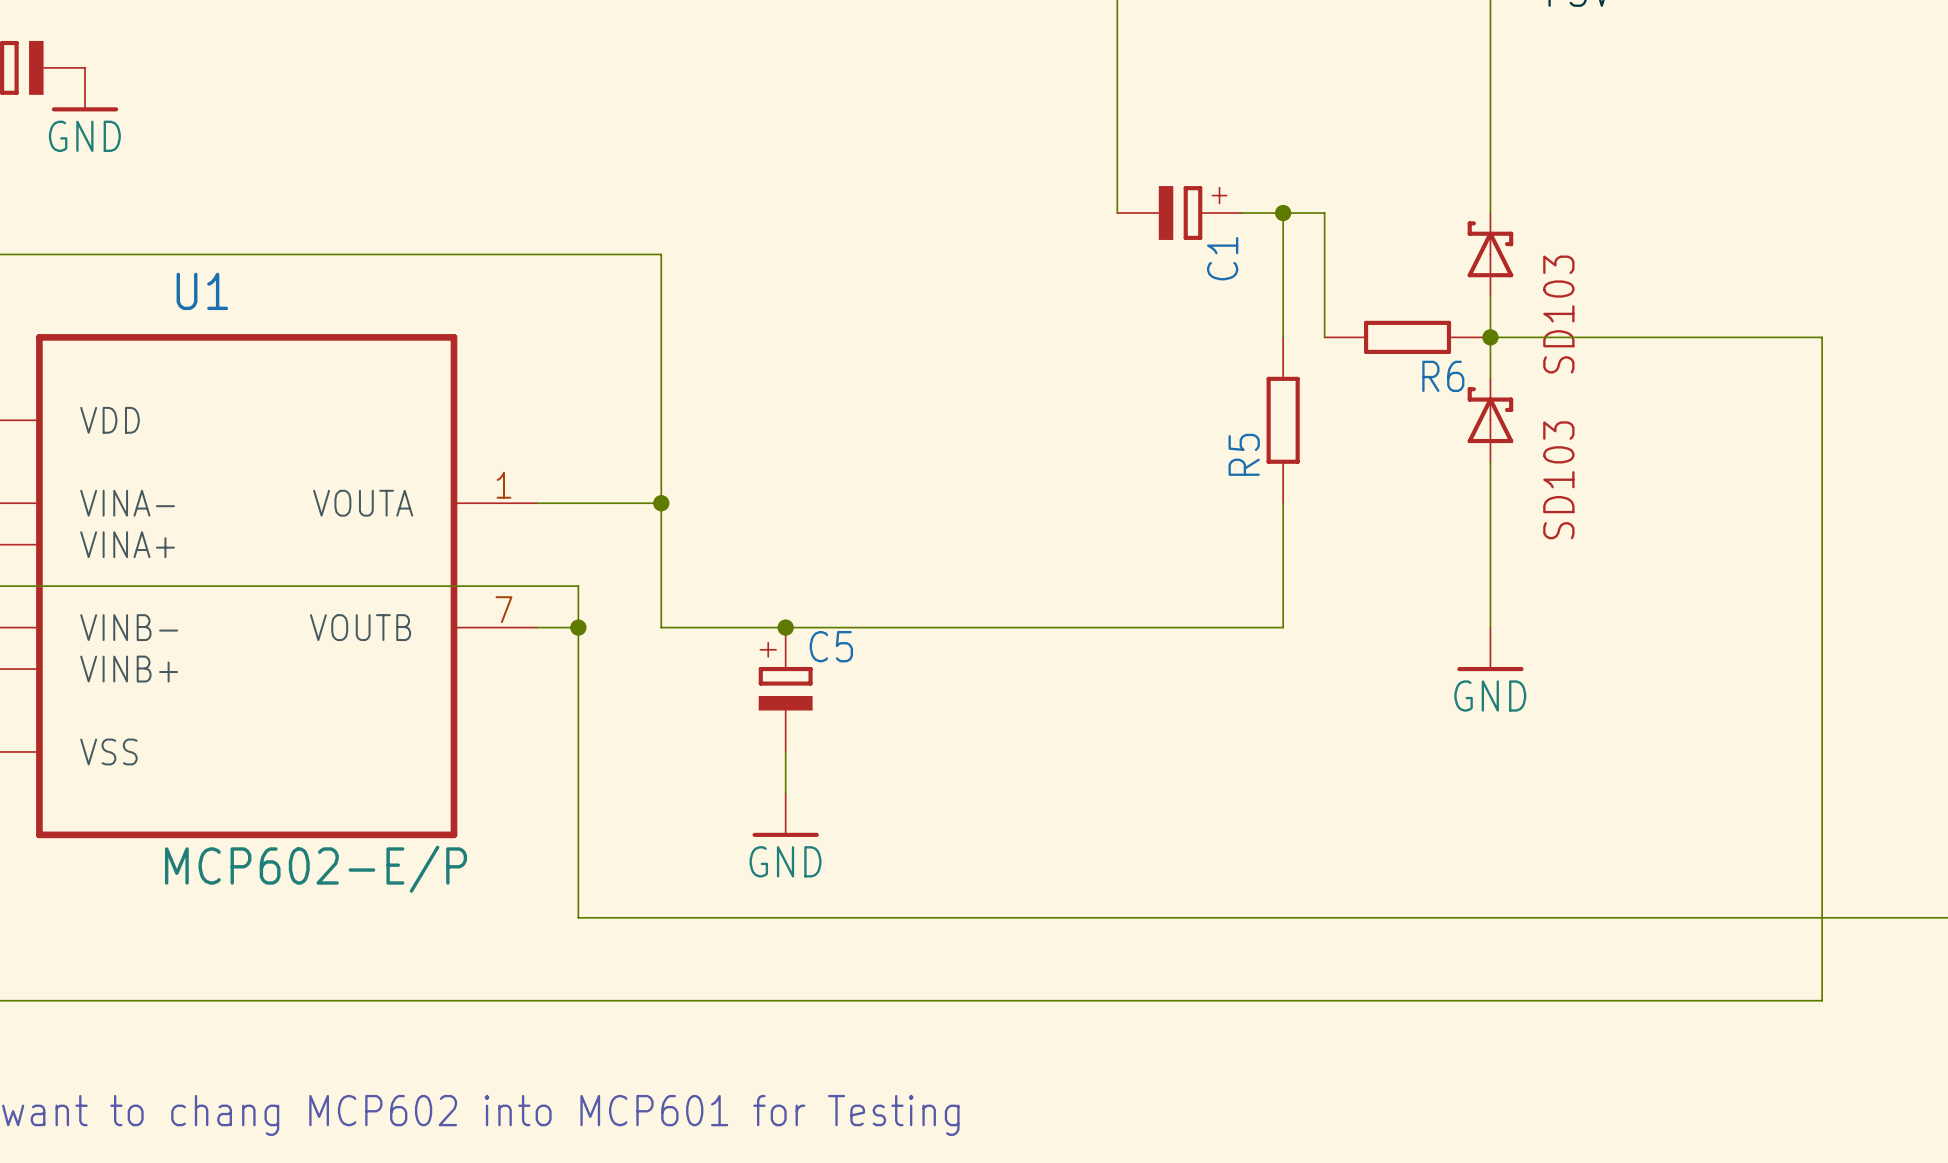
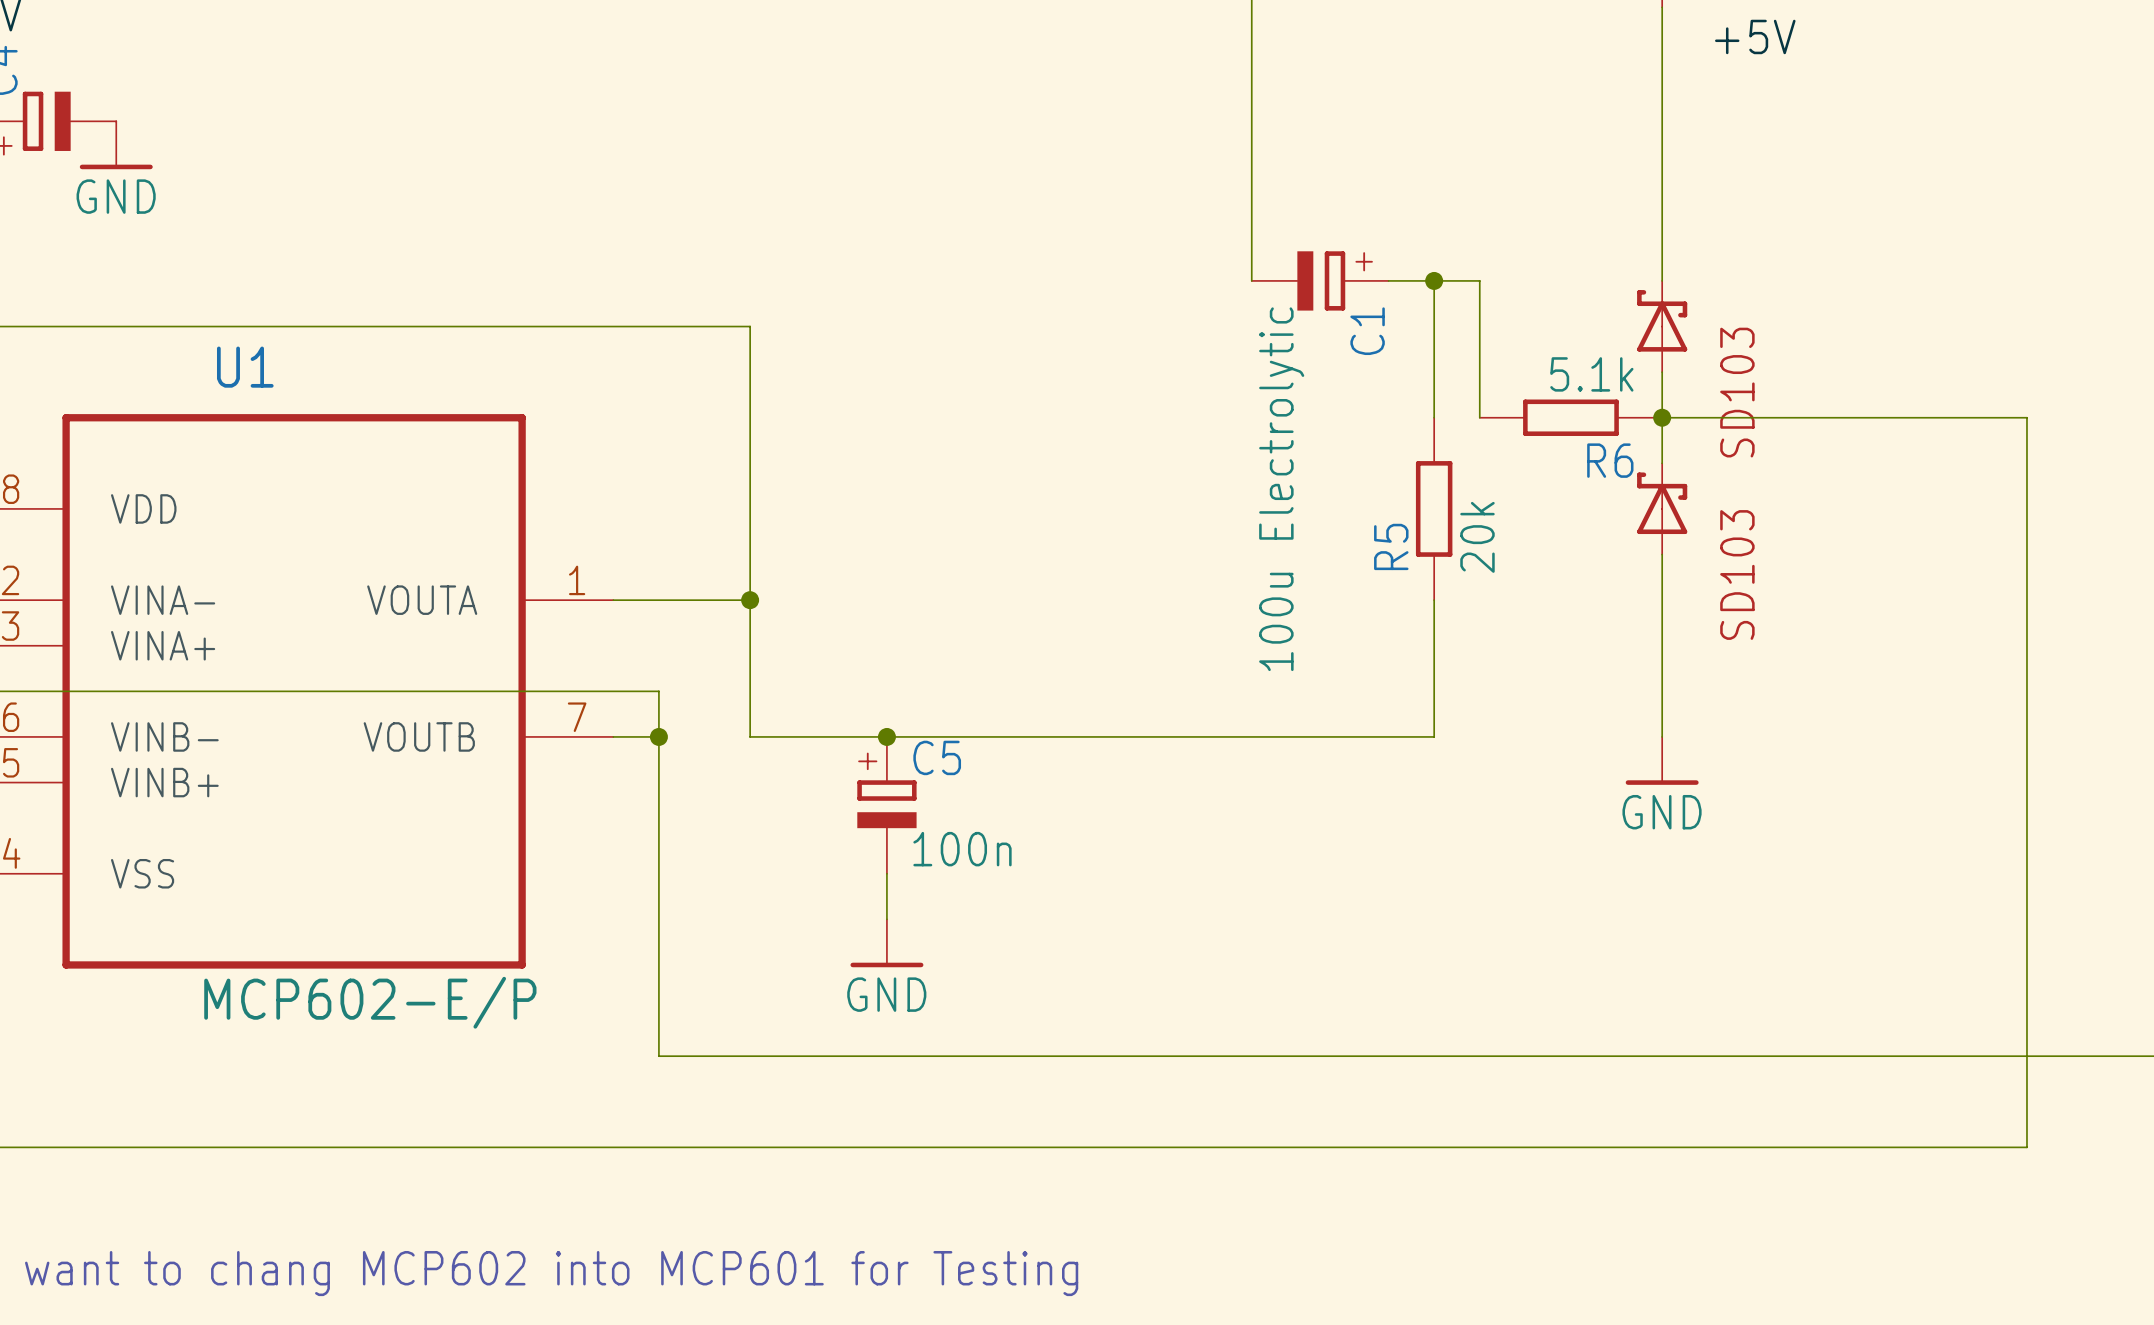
R6 value: none -> 5.1k (1591, 374)
C1 value: none -> 100u Electrolytic (1281, 489)
R5 value: none -> 20k (1477, 537)
C5 value: none -> 100n (962, 849)

